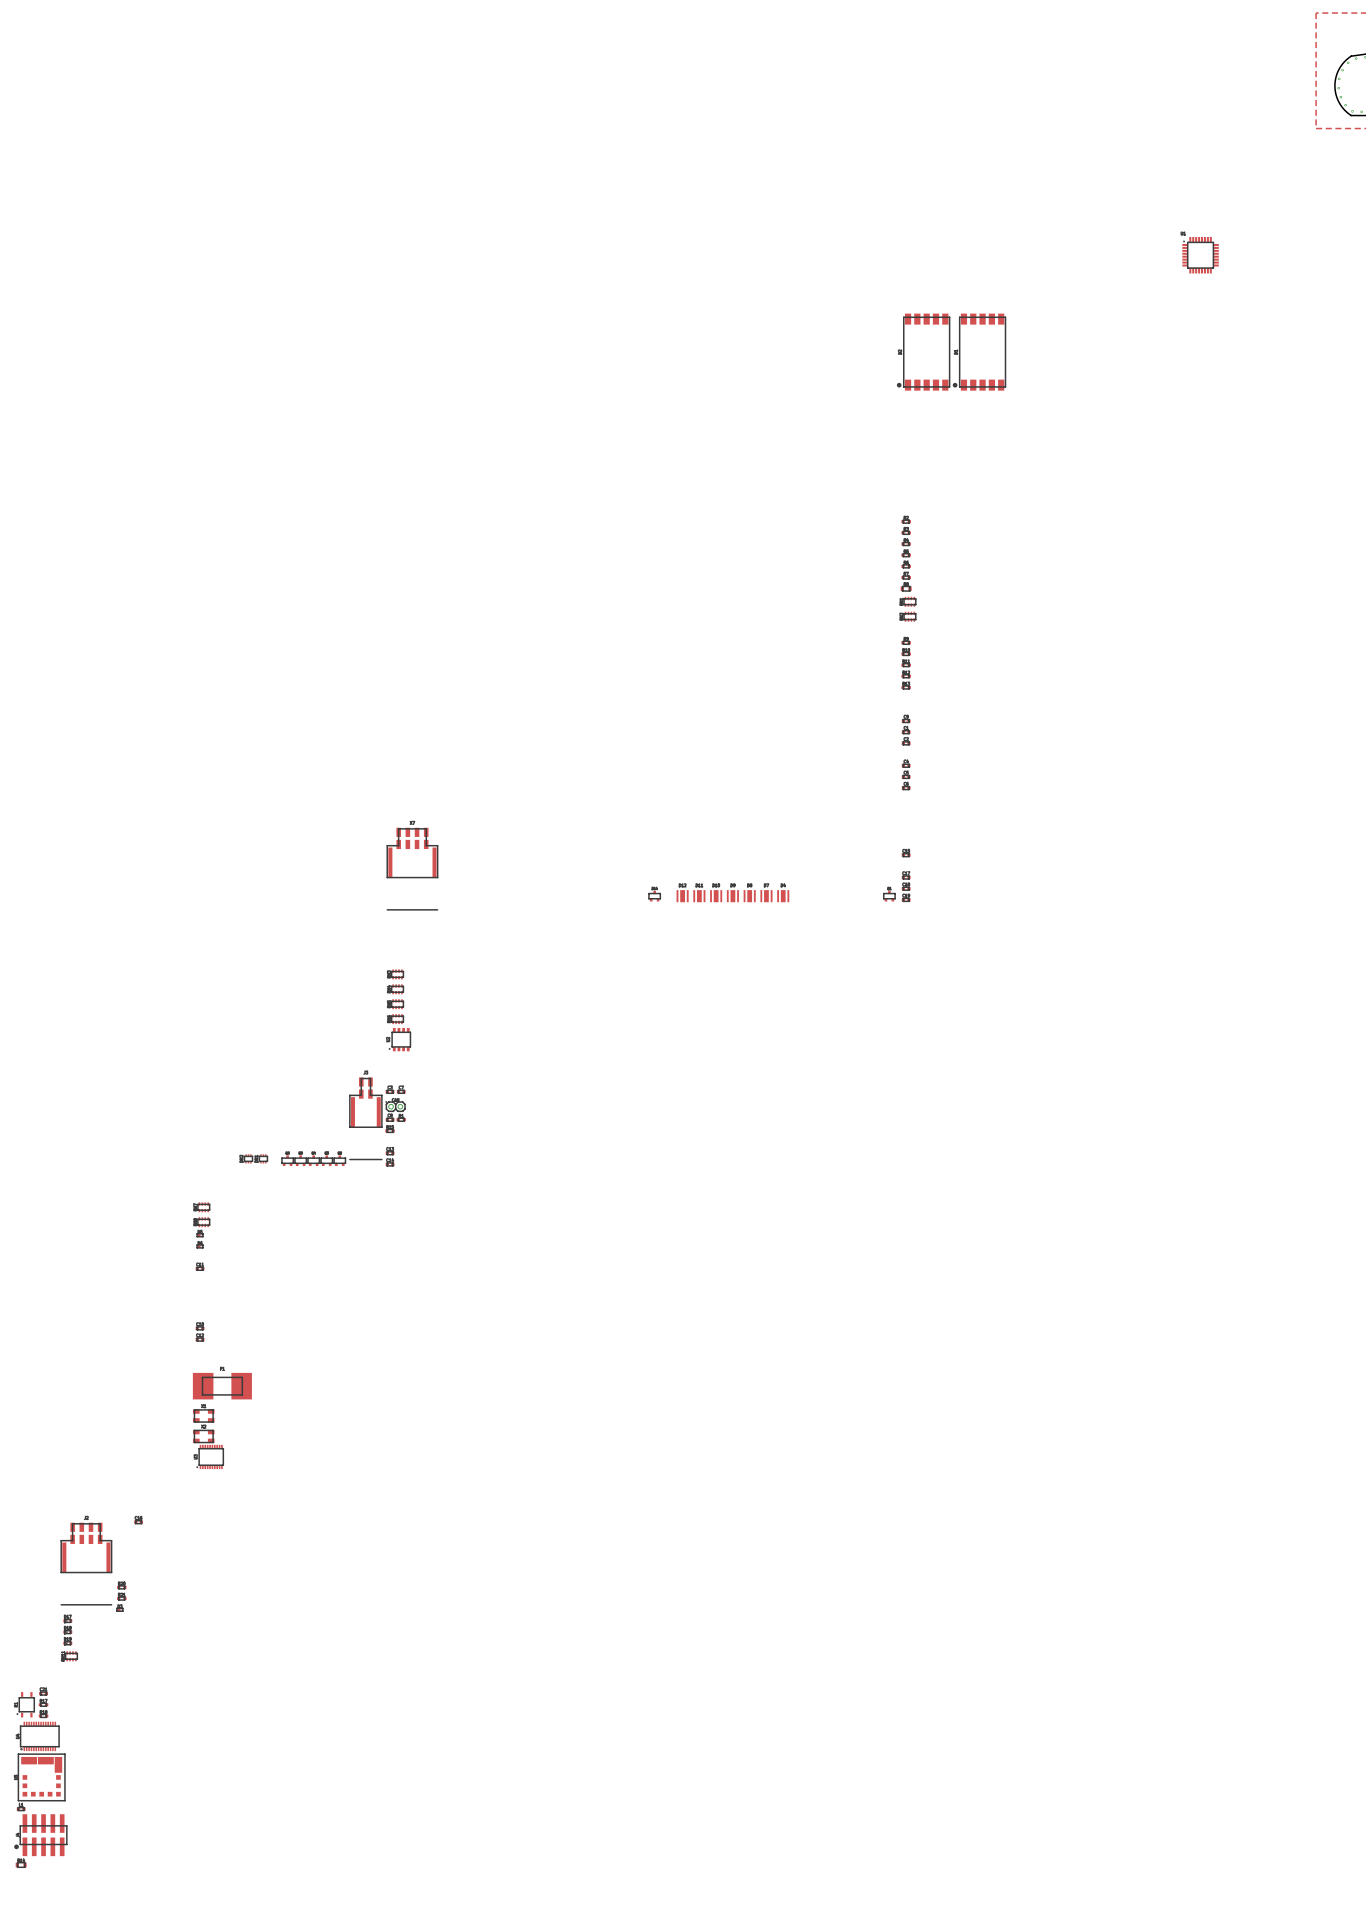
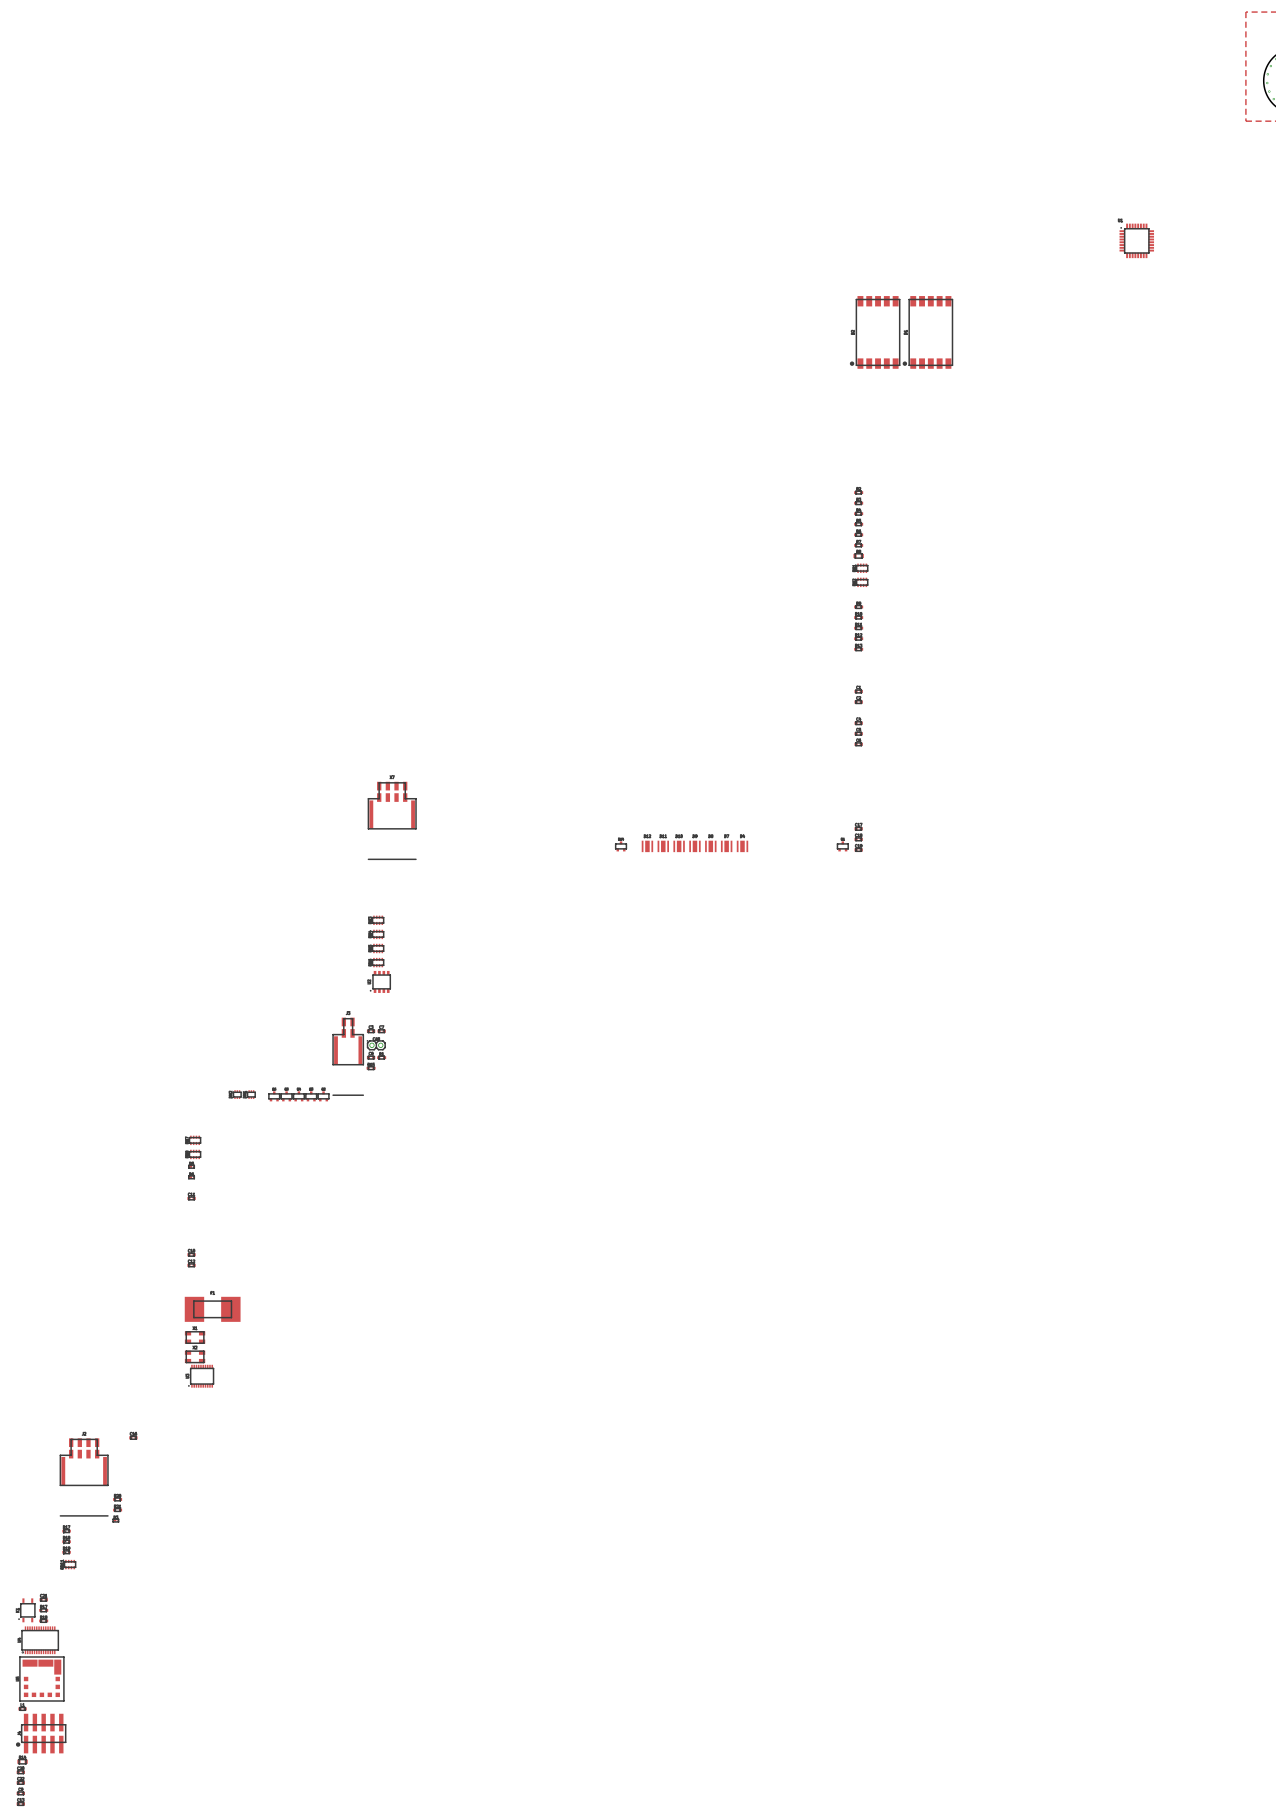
part position: (906, 721) -> (20, 1793)
part: (906, 855) -> none
part position: (390, 1153) -> (20, 1803)
part: (390, 1164) -> none
part: none -> (20, 1772)
part: none -> (20, 1782)

